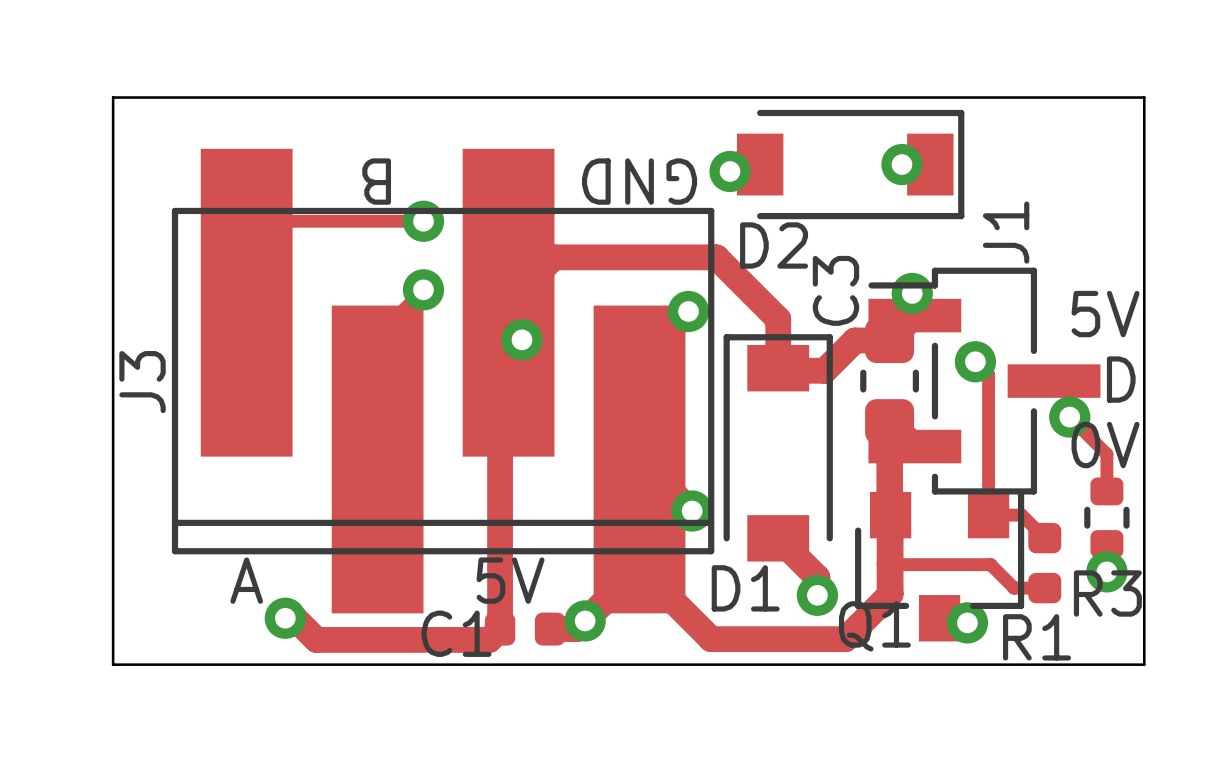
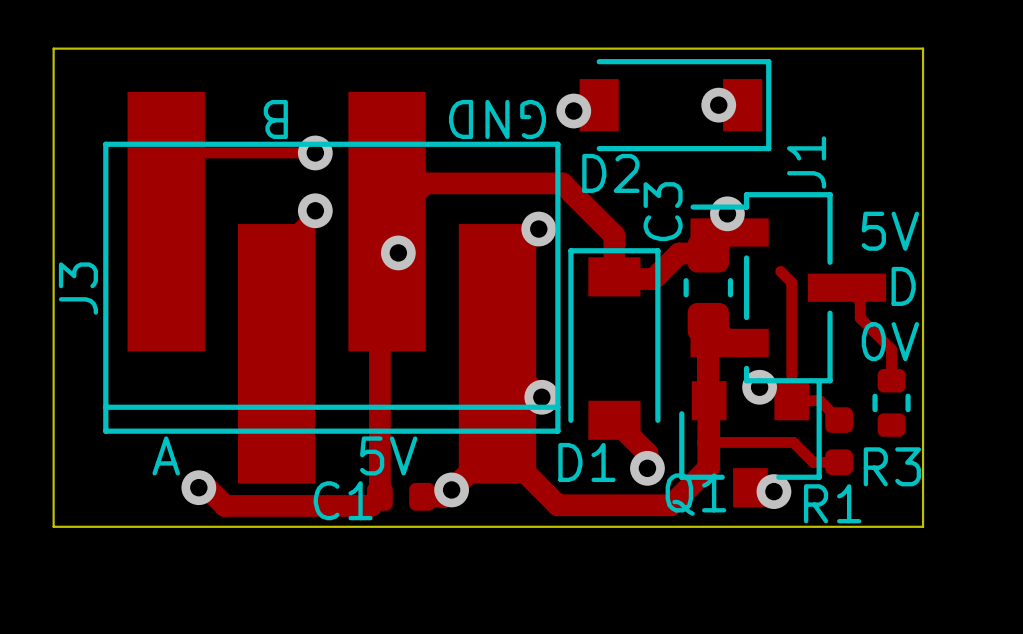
via: (975, 361) -> none
via: (1069, 417) -> none
via: none -> (759, 387)
via: (1106, 571) -> none

